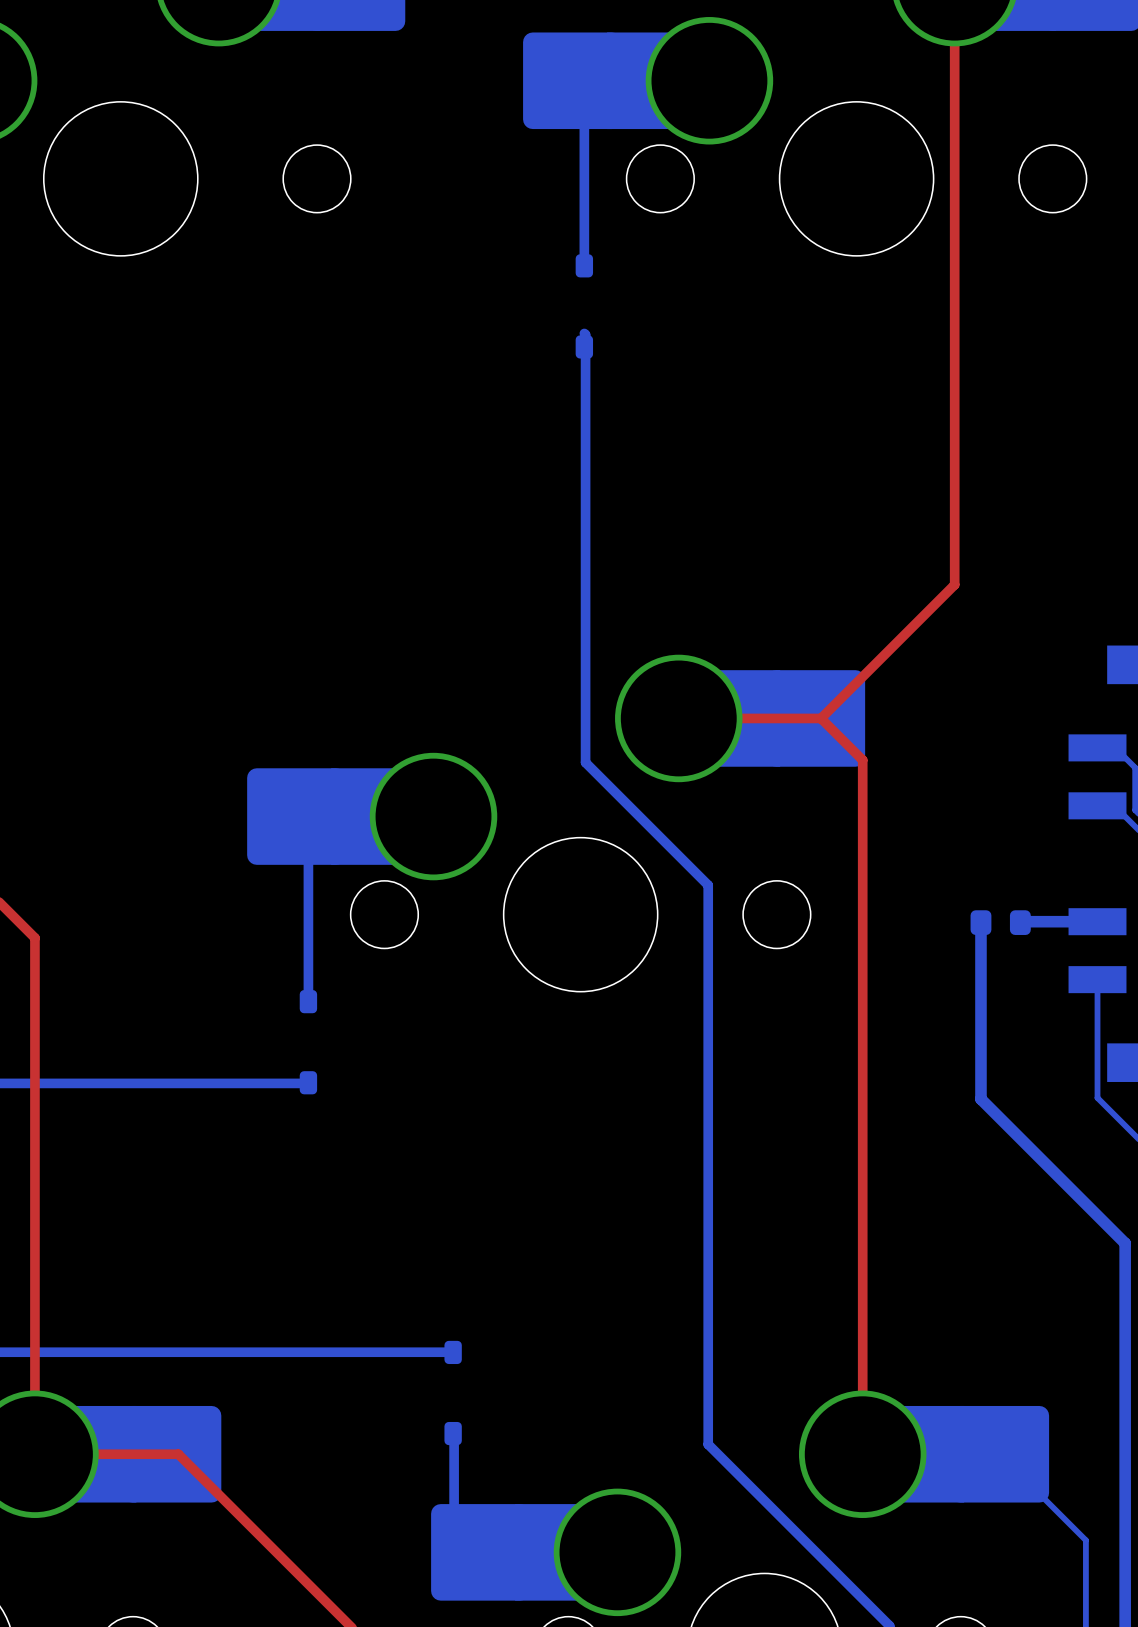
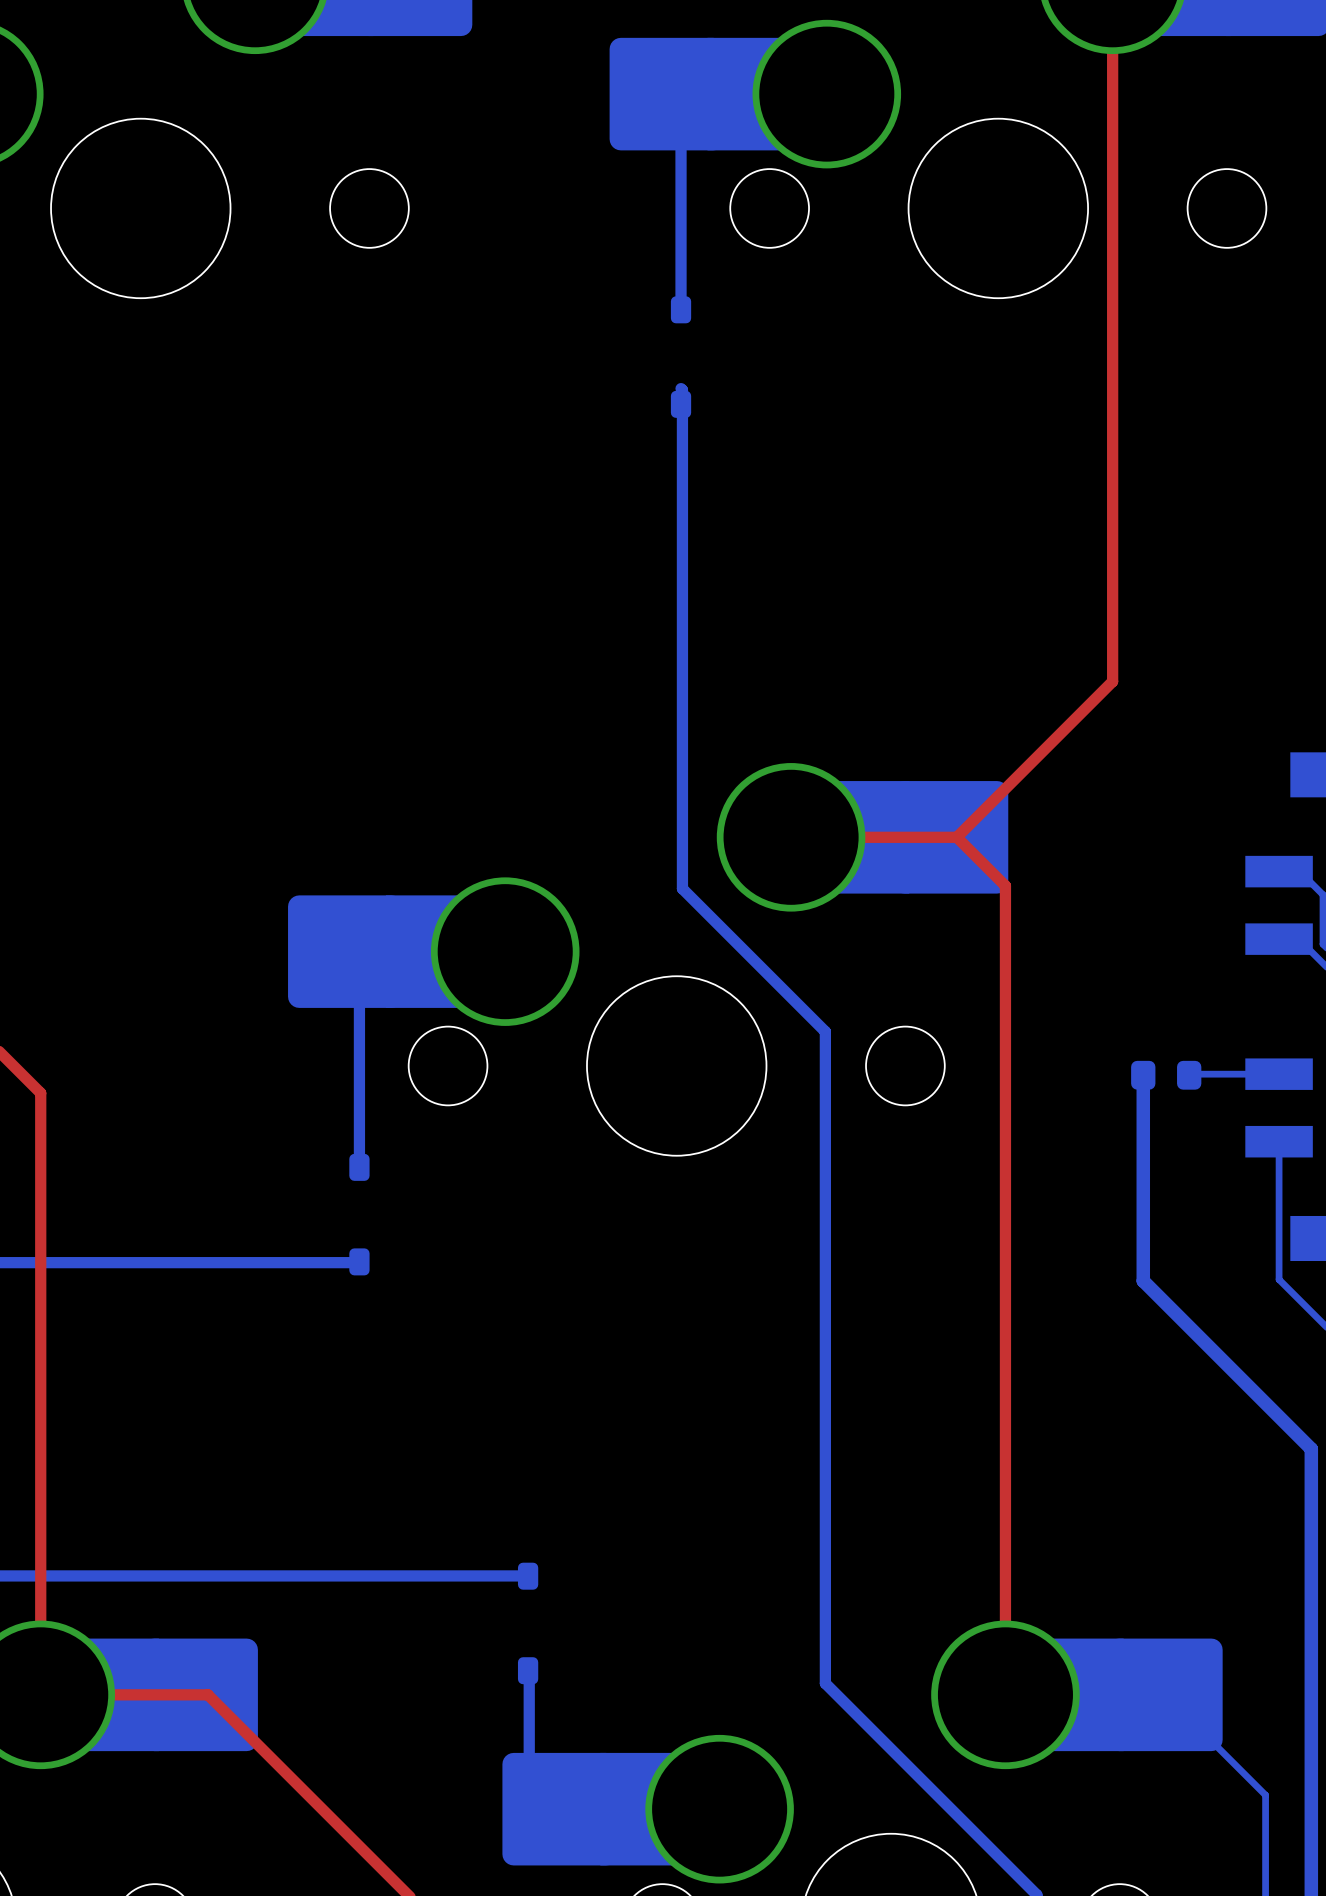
bottom track width: thick (1021, 921) (1097, 921) -> thin (1190, 1074) (1279, 1074)

